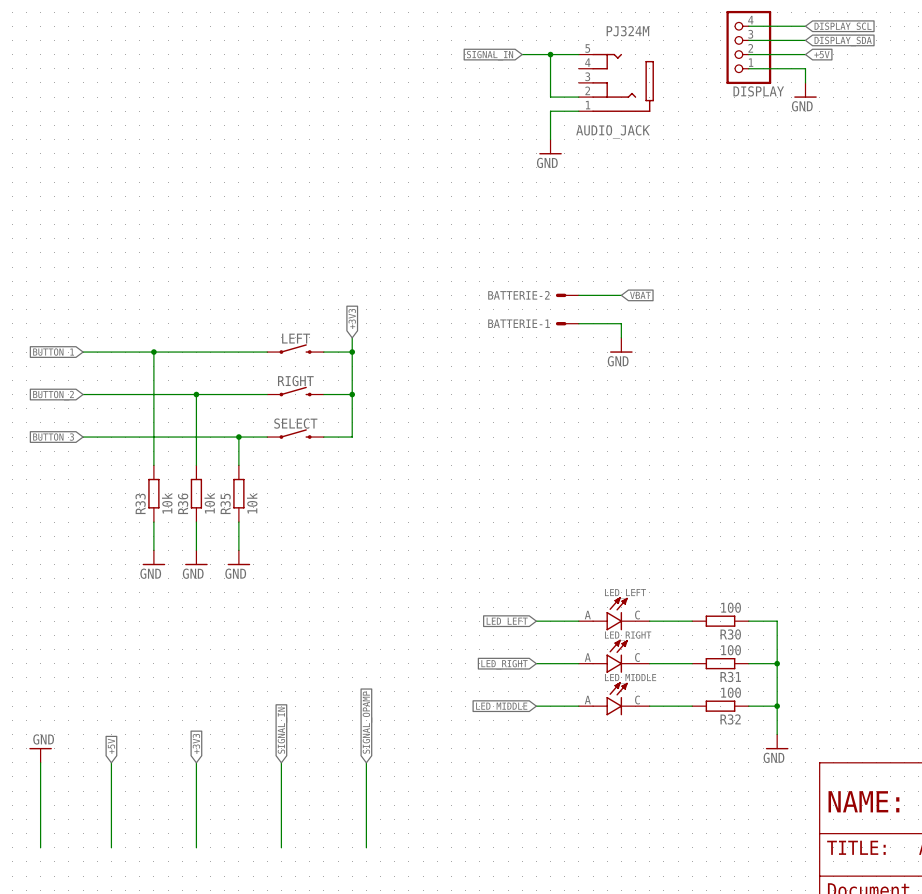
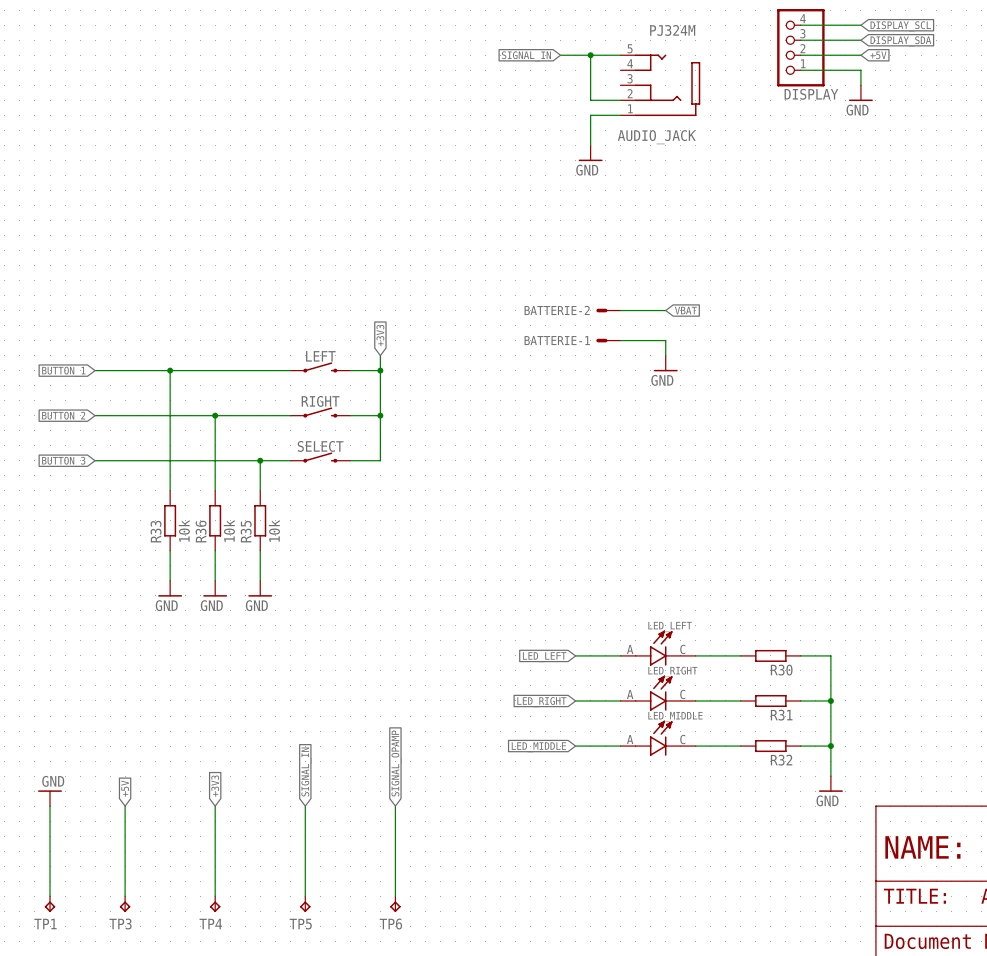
R30 value: 100 (731, 607) -> none
R31 value: 100 (731, 650) -> none
R32 value: 100 (731, 692) -> none
TP1: none -> (50, 904)
TP3: none -> (125, 904)
TP4: none -> (215, 904)
TP5: none -> (305, 904)
TP6: none -> (395, 904)

